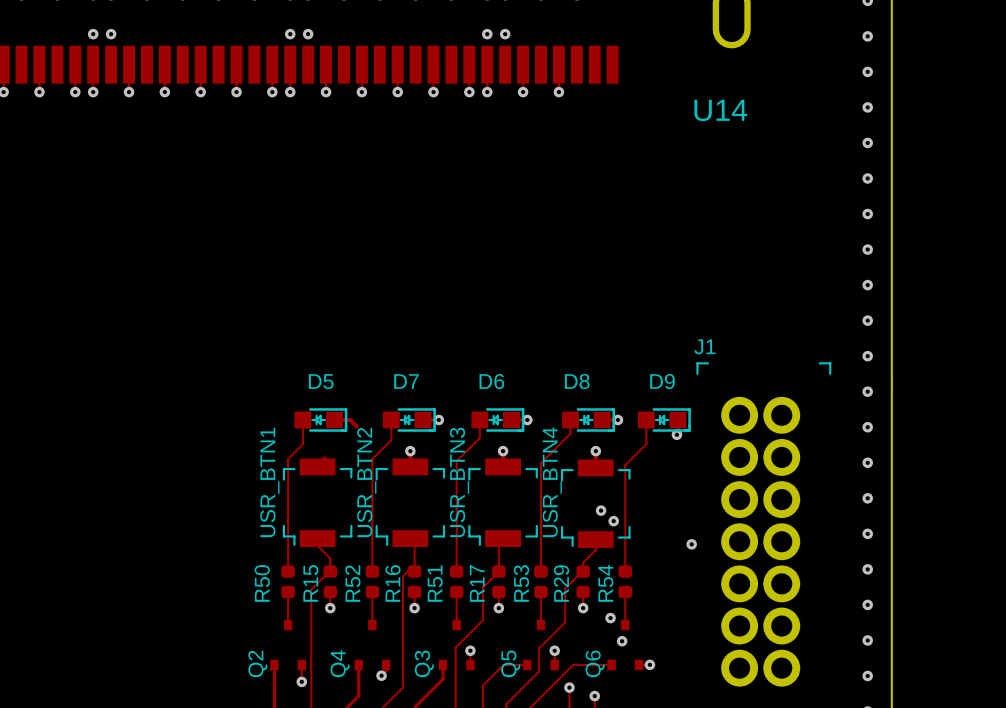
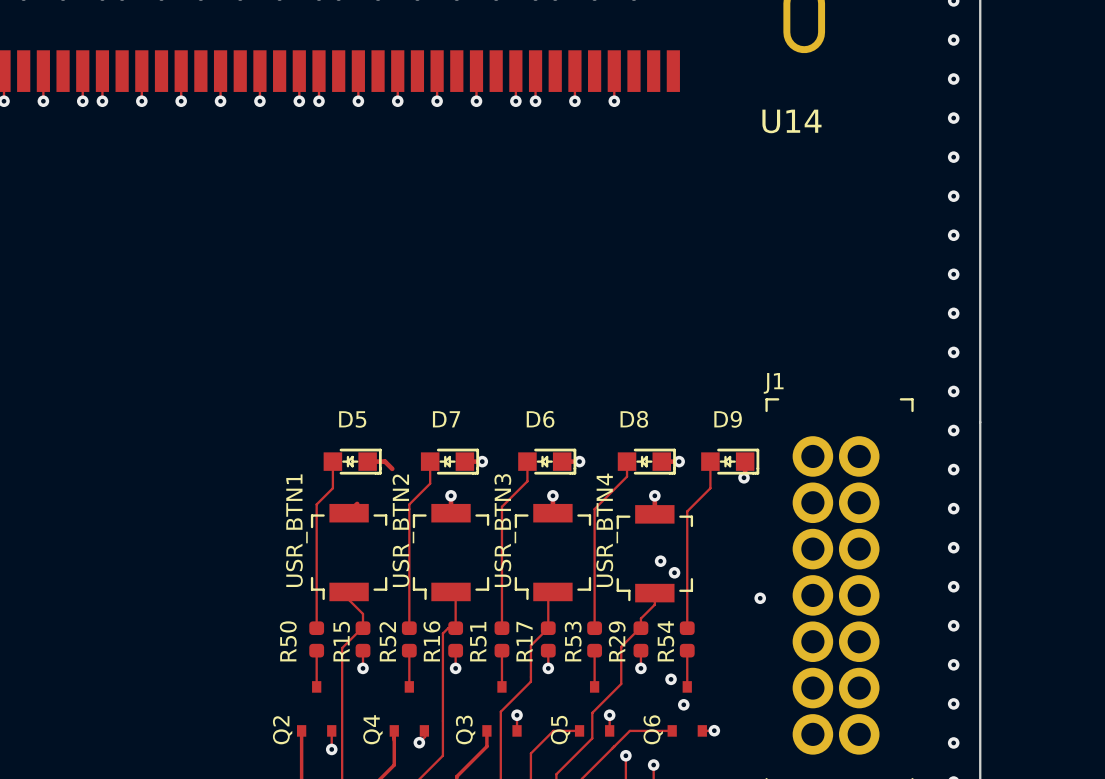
via: (93, 34) -> none
via: (111, 34) -> none
via: (290, 34) -> none
via: (308, 34) -> none
via: (487, 34) -> none
via: (505, 34) -> none

